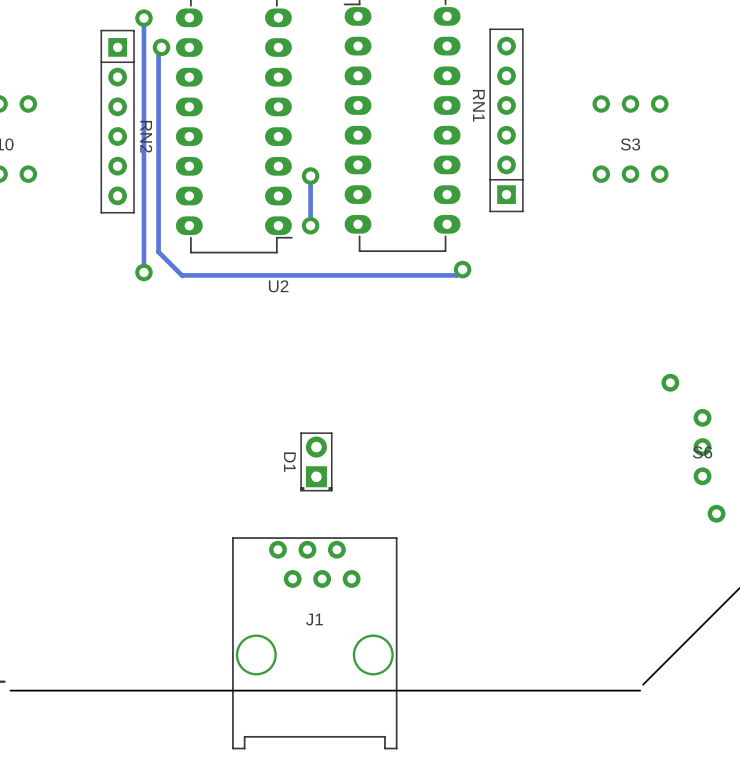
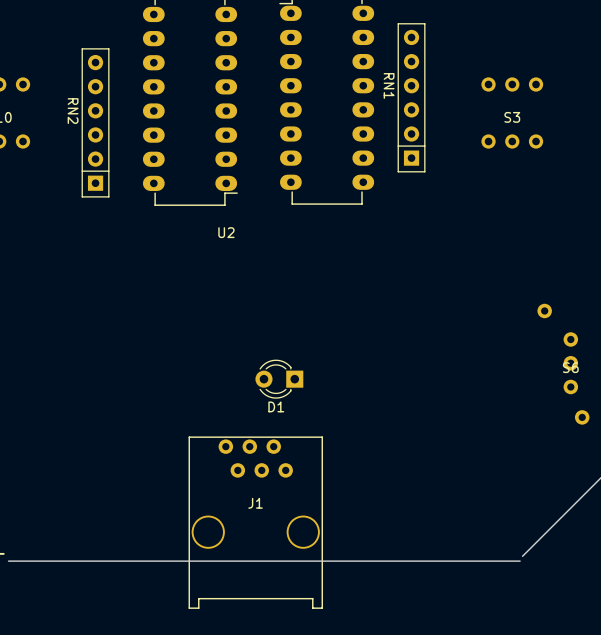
track: (143, 18) (143, 272) -> none
via: (143, 18) -> none
track: (161, 47) (158, 50) (158, 252) (181, 275) (456, 275) (462, 269) -> none
via: (161, 47) -> none
RN2 rotation: 0° (117, 121) -> 180° (95, 122)
track: (310, 176) (310, 225) -> none
via: (310, 176) -> none
via: (310, 225) -> none
via: (462, 269) -> none
via: (143, 272) -> none
D1 footprint: [300, 432, 333, 492] -> [255, 359, 304, 399]
D1 name position: D1 (289, 462) -> D1 (276, 406)

